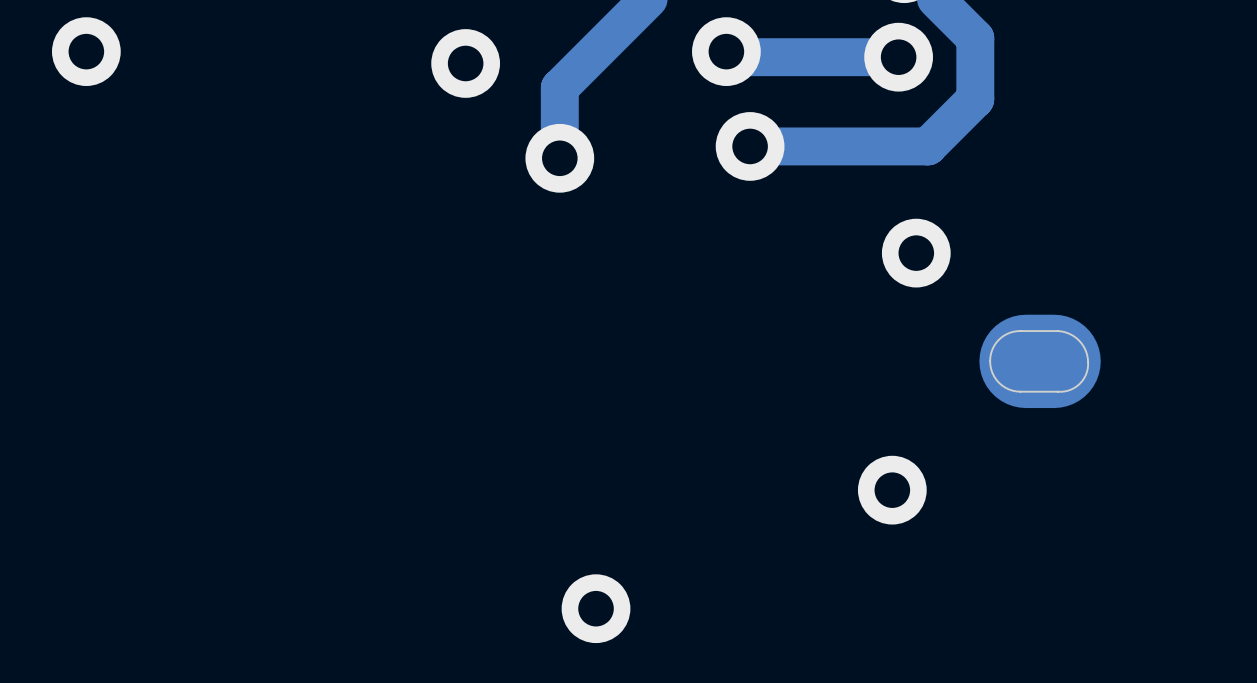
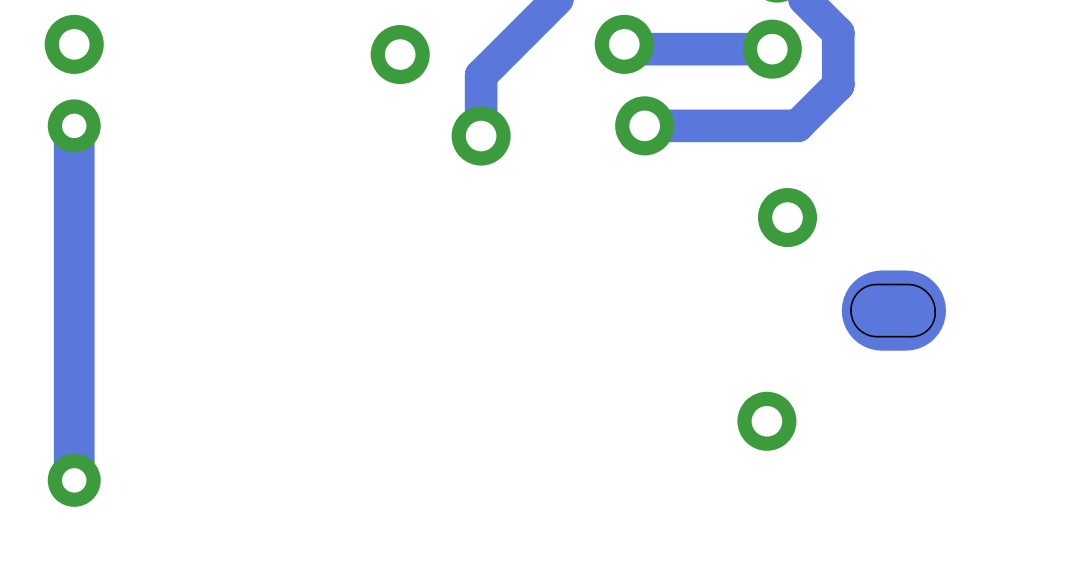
track: none -> (74, 125) (74, 480)
via: none -> (74, 125)
via: none -> (74, 480)
via: (596, 608) -> none

